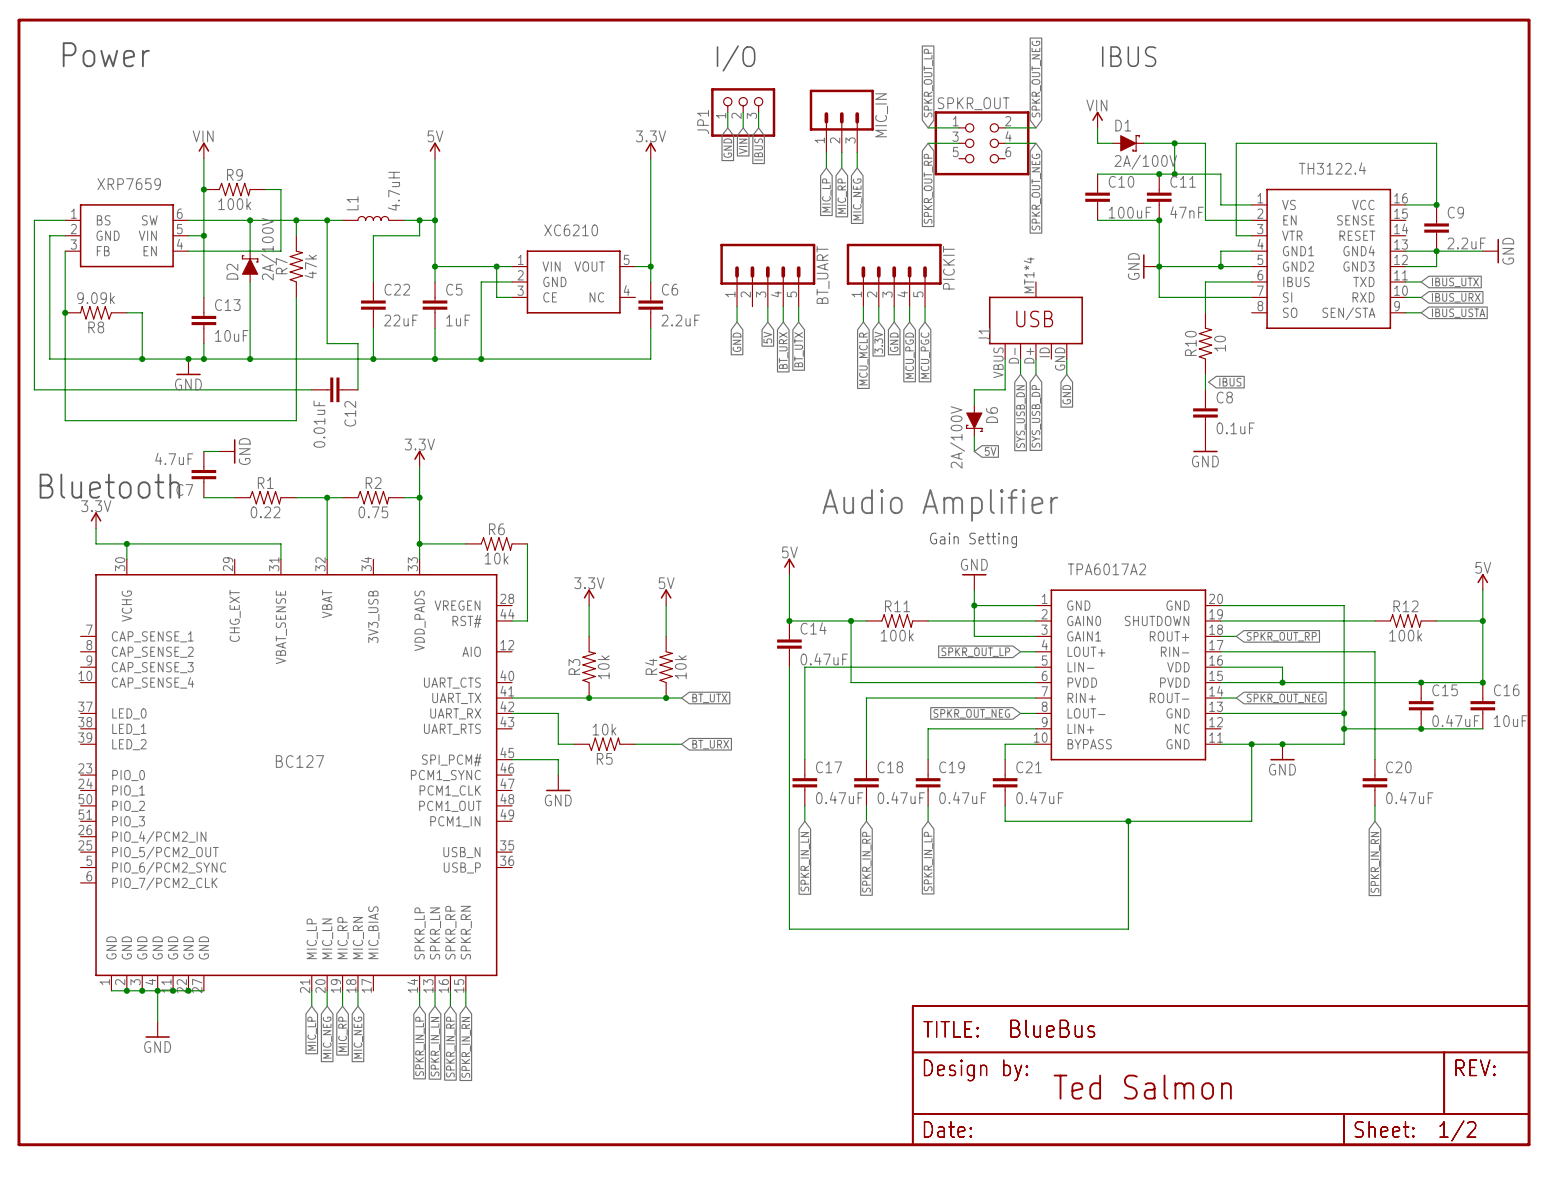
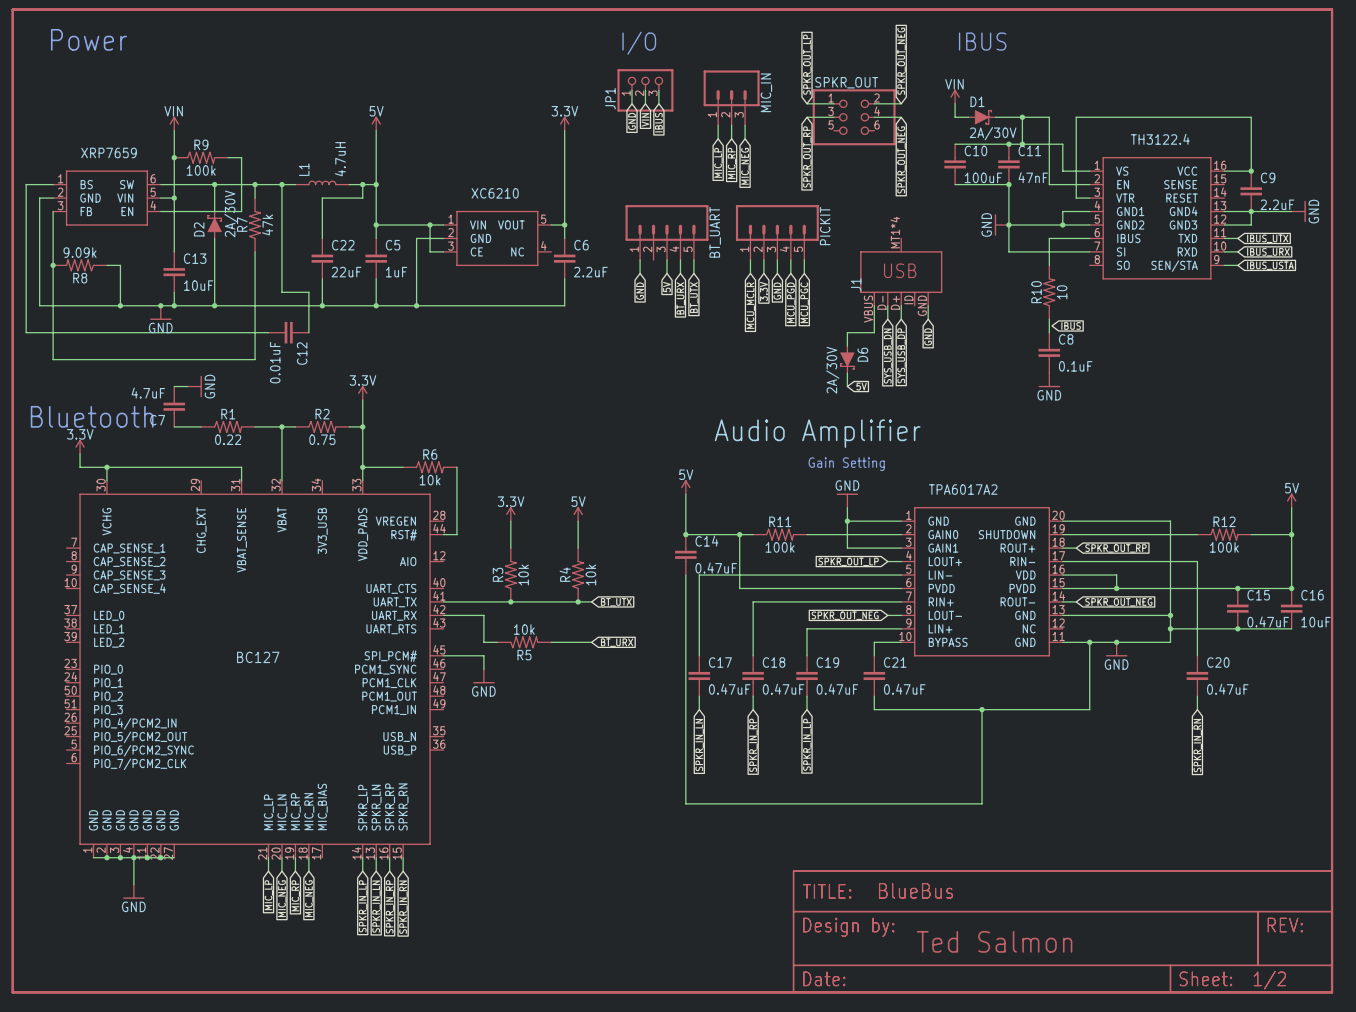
D1 value: 2A/100V (1145, 162) -> 2A/30V (993, 133)
D2 value: 2A/100V (268, 249) -> 2A/30V (231, 213)
D6 value: 2A/100V (957, 437) -> 2A/30V (832, 370)

